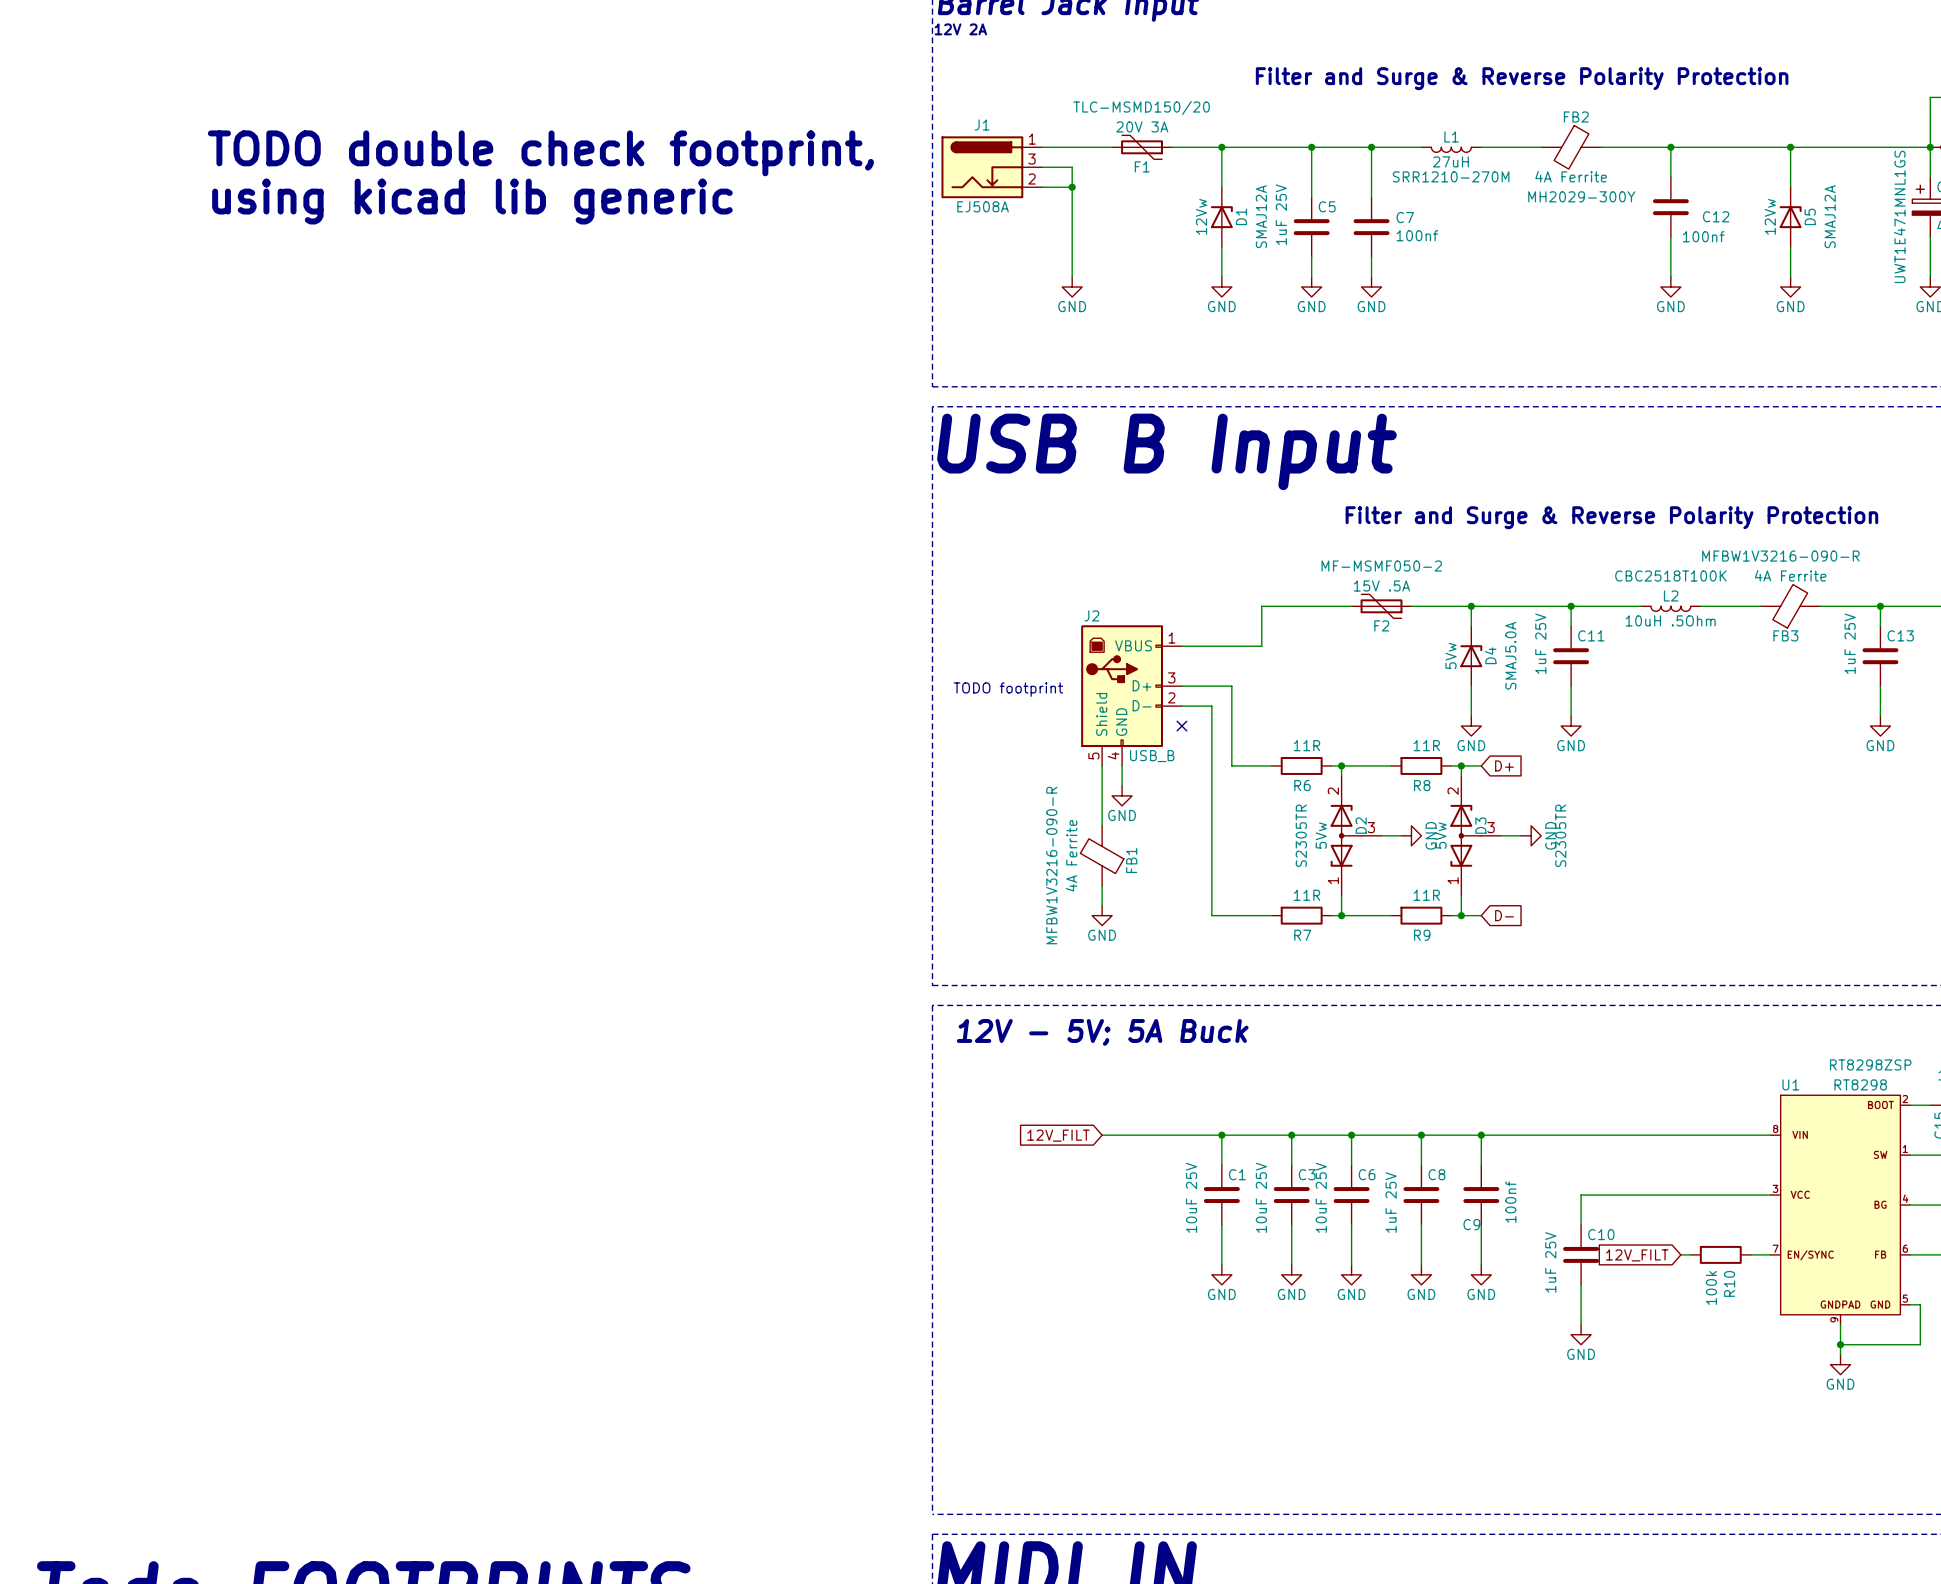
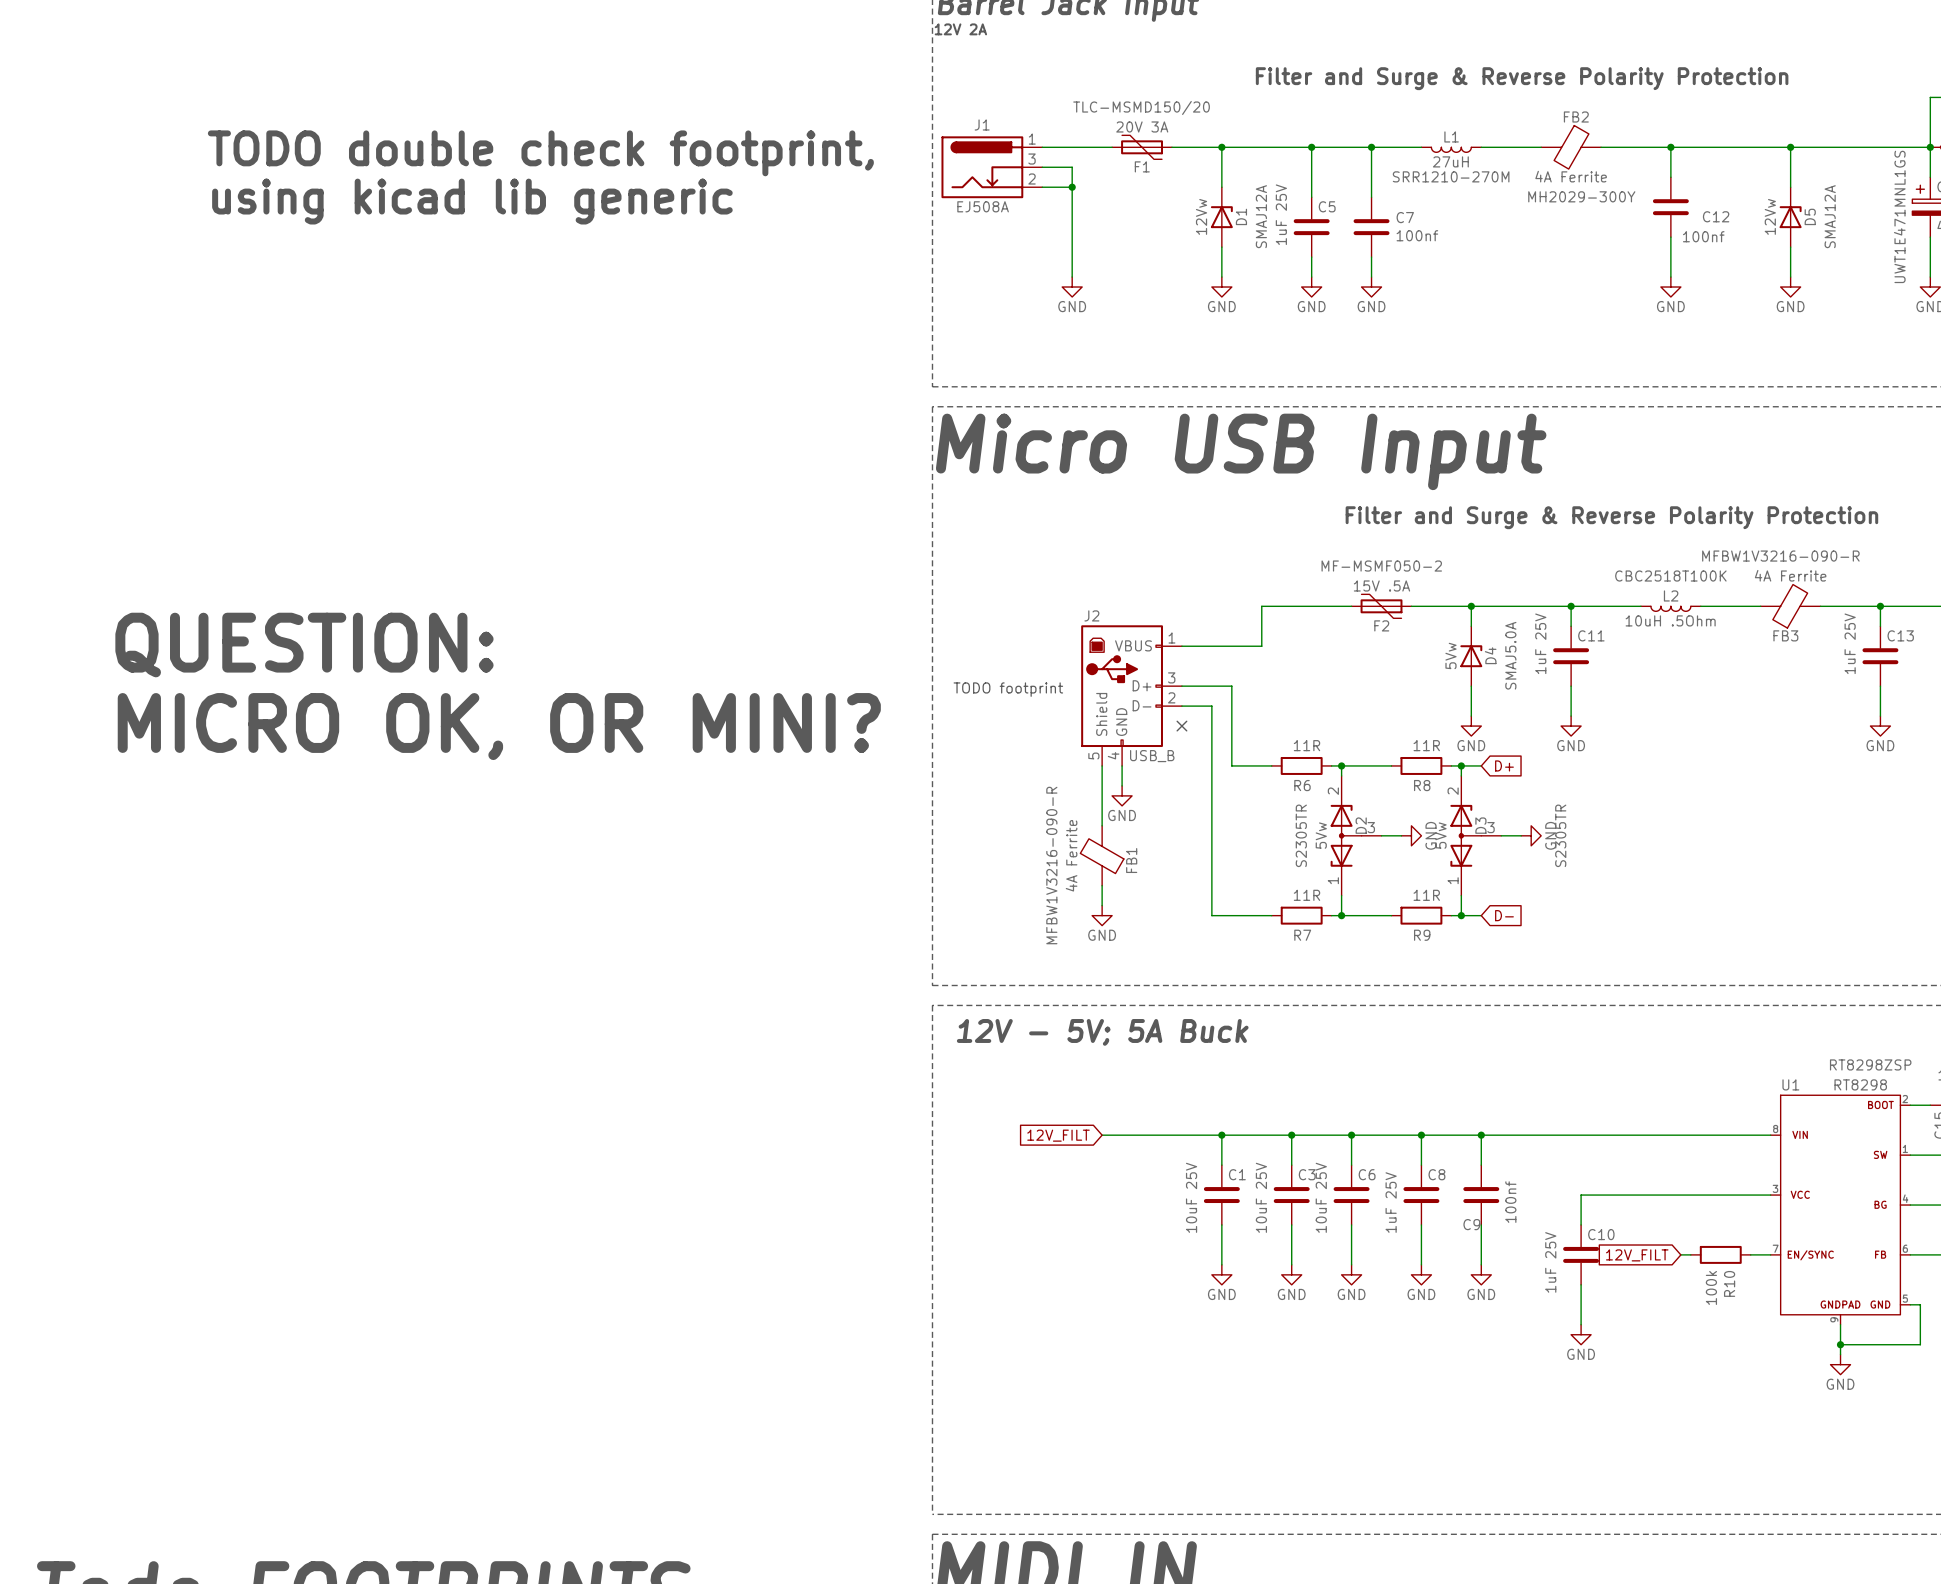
text: USB B Input (1166, 451) -> Micro USB Input (1241, 451)
text: none -> QUESTION: (304, 645)
text: none -> MICRO OK, OR MINI? (499, 726)

